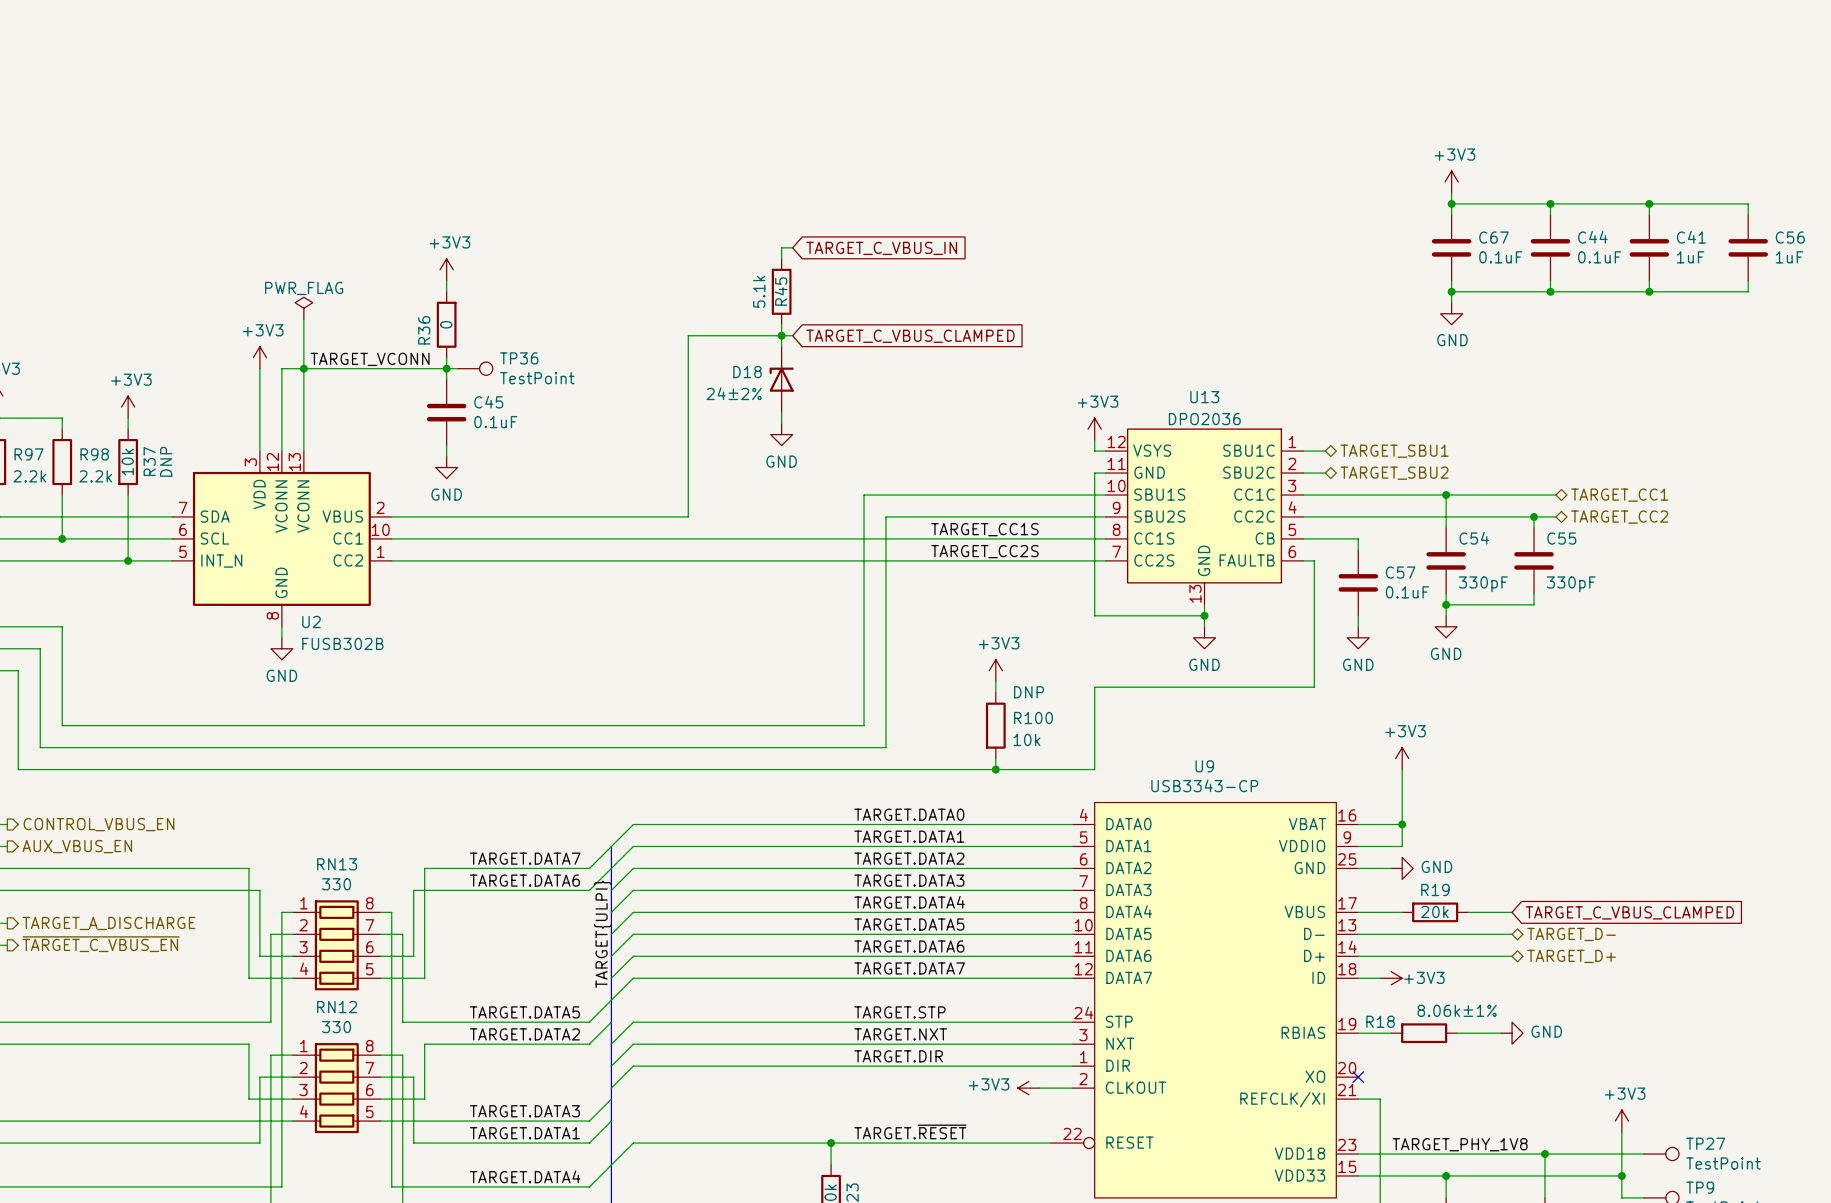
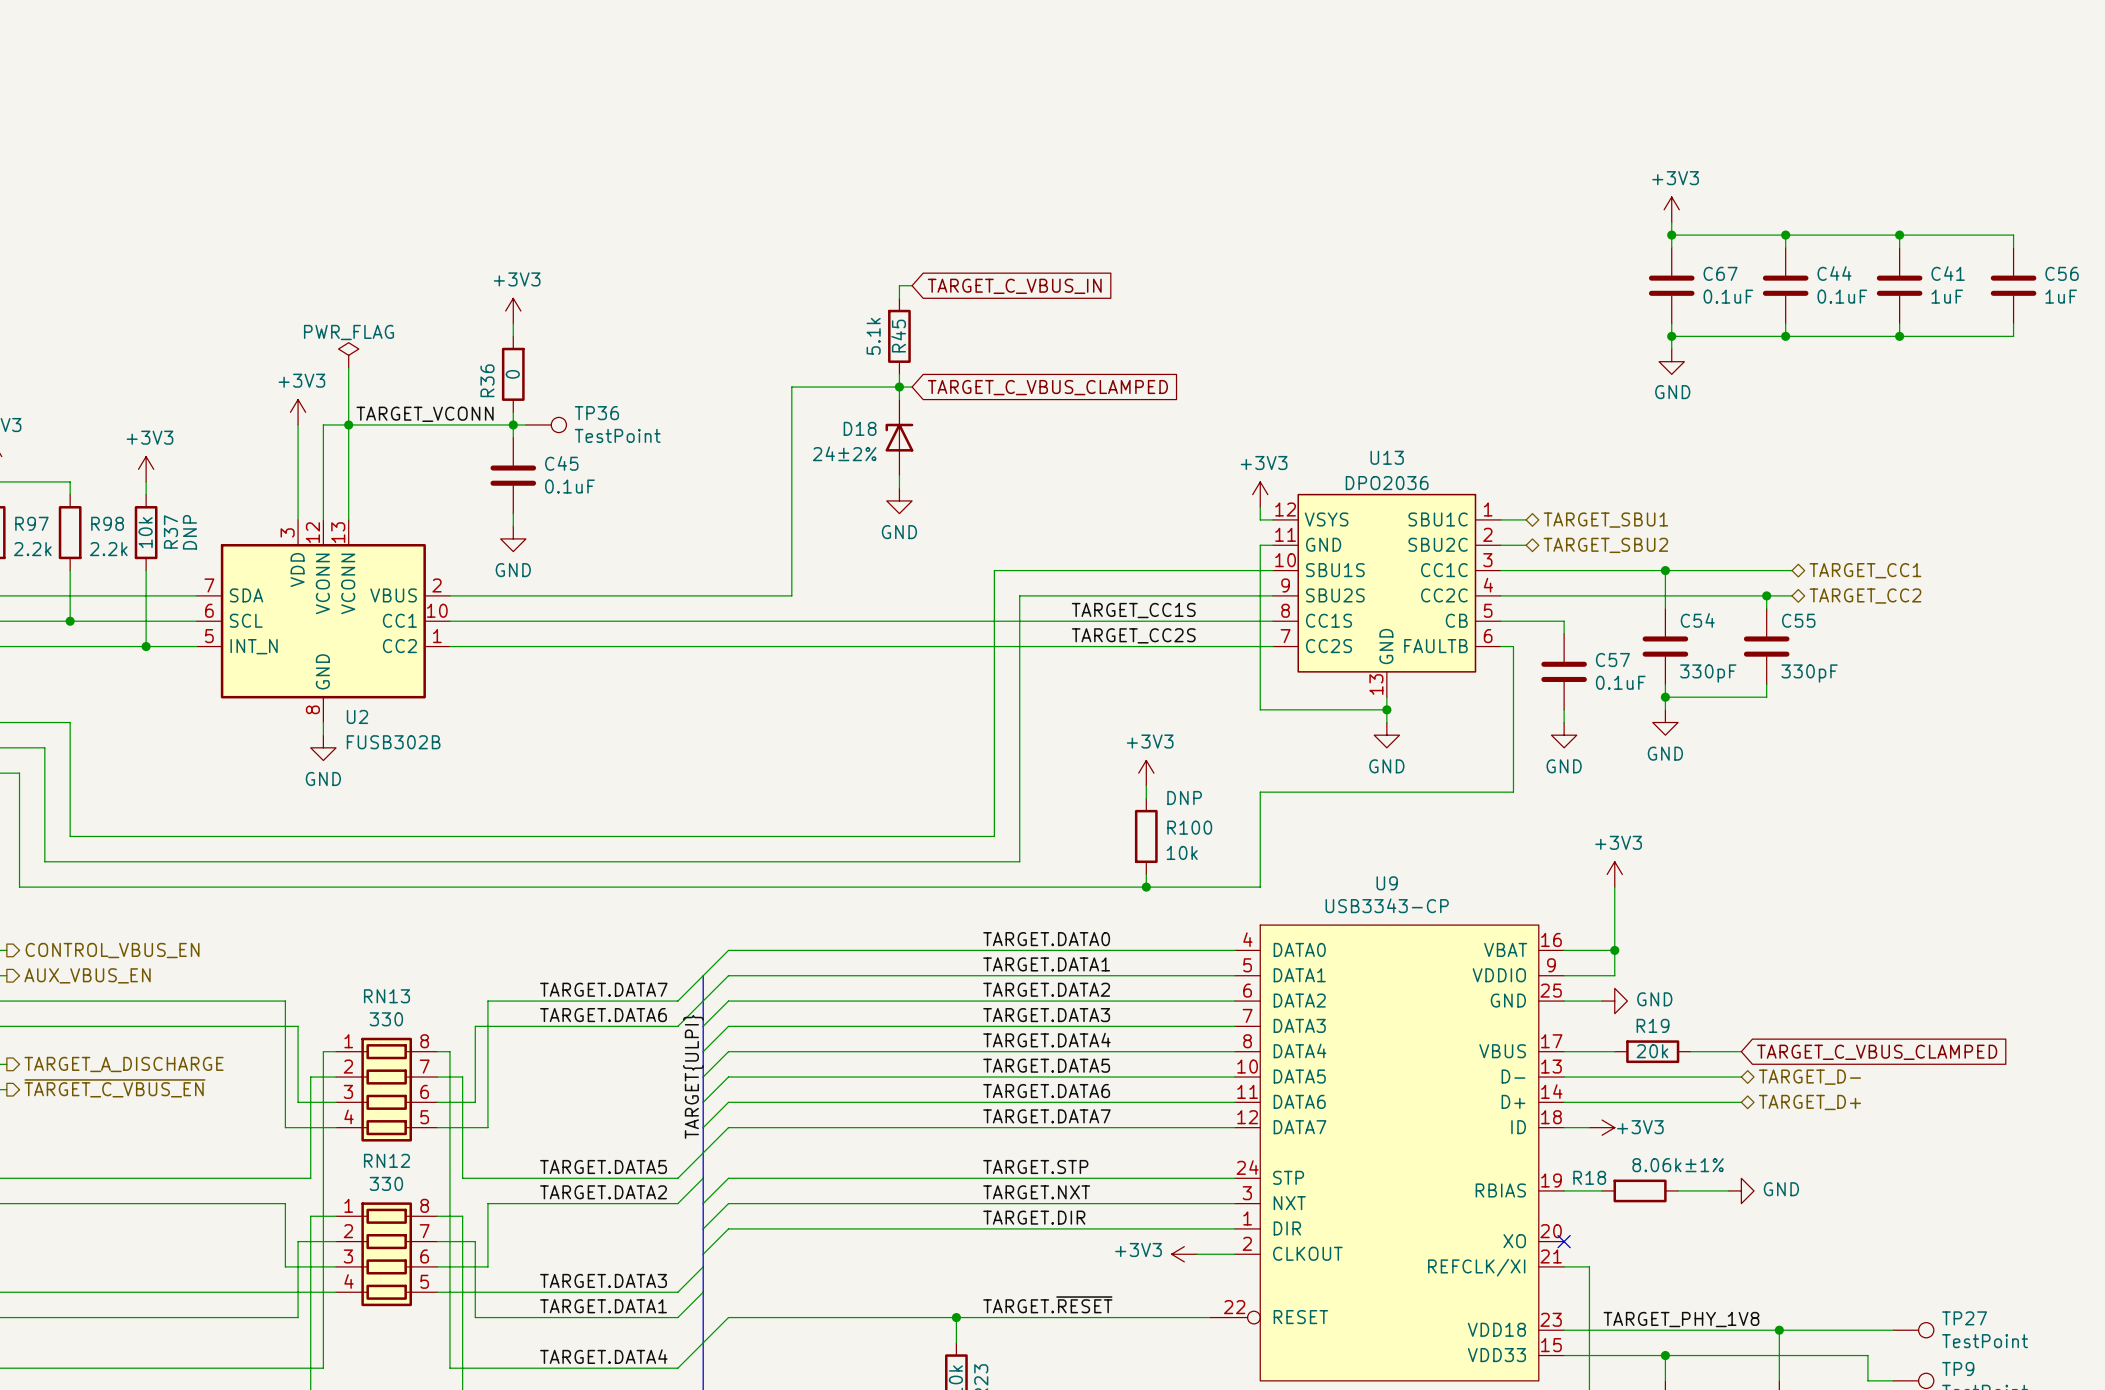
power symbol: +3V3 (1621, 1121) -> none
wire: (1621, 1132) (1621, 1175) -> none
junction: (1621, 1175) -> none

